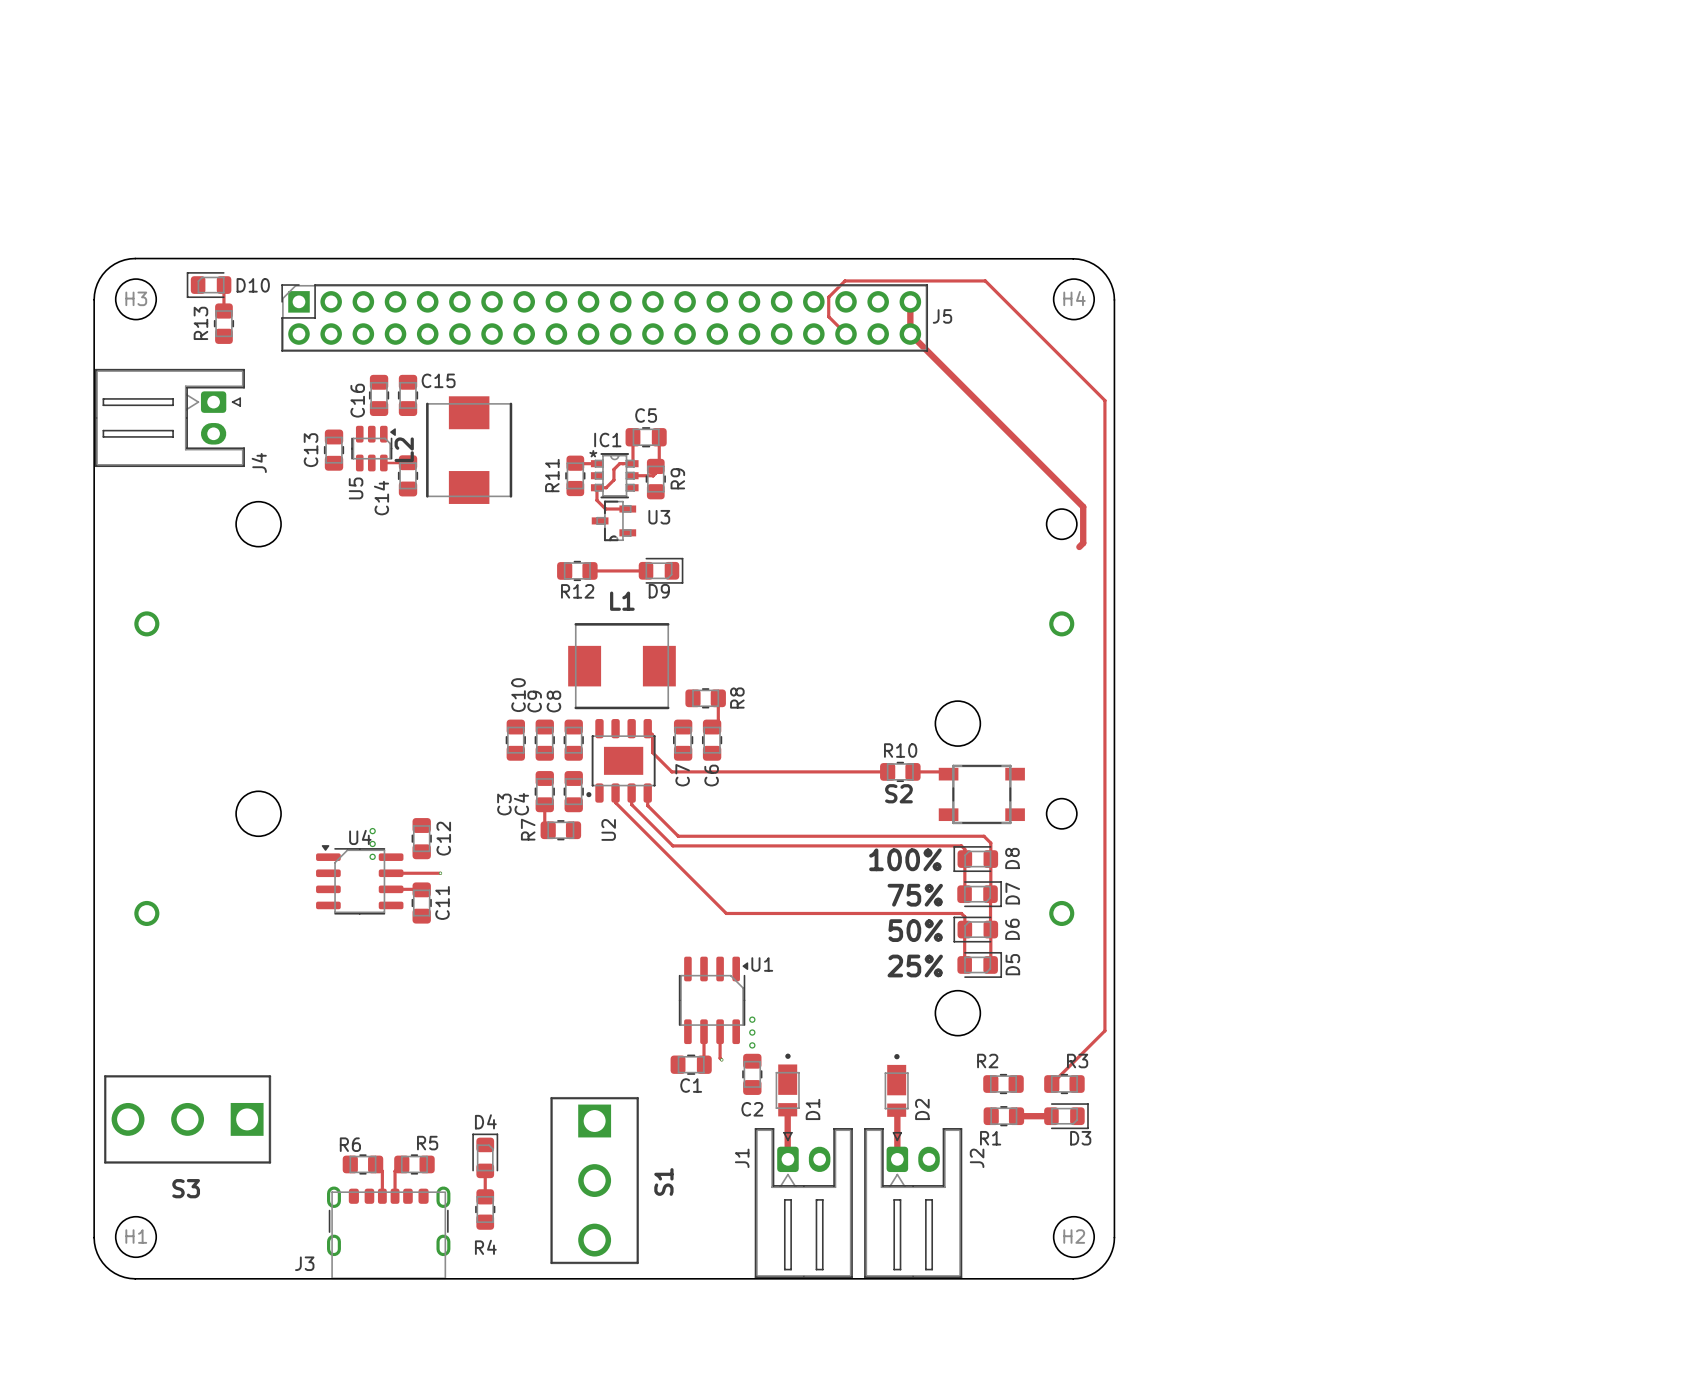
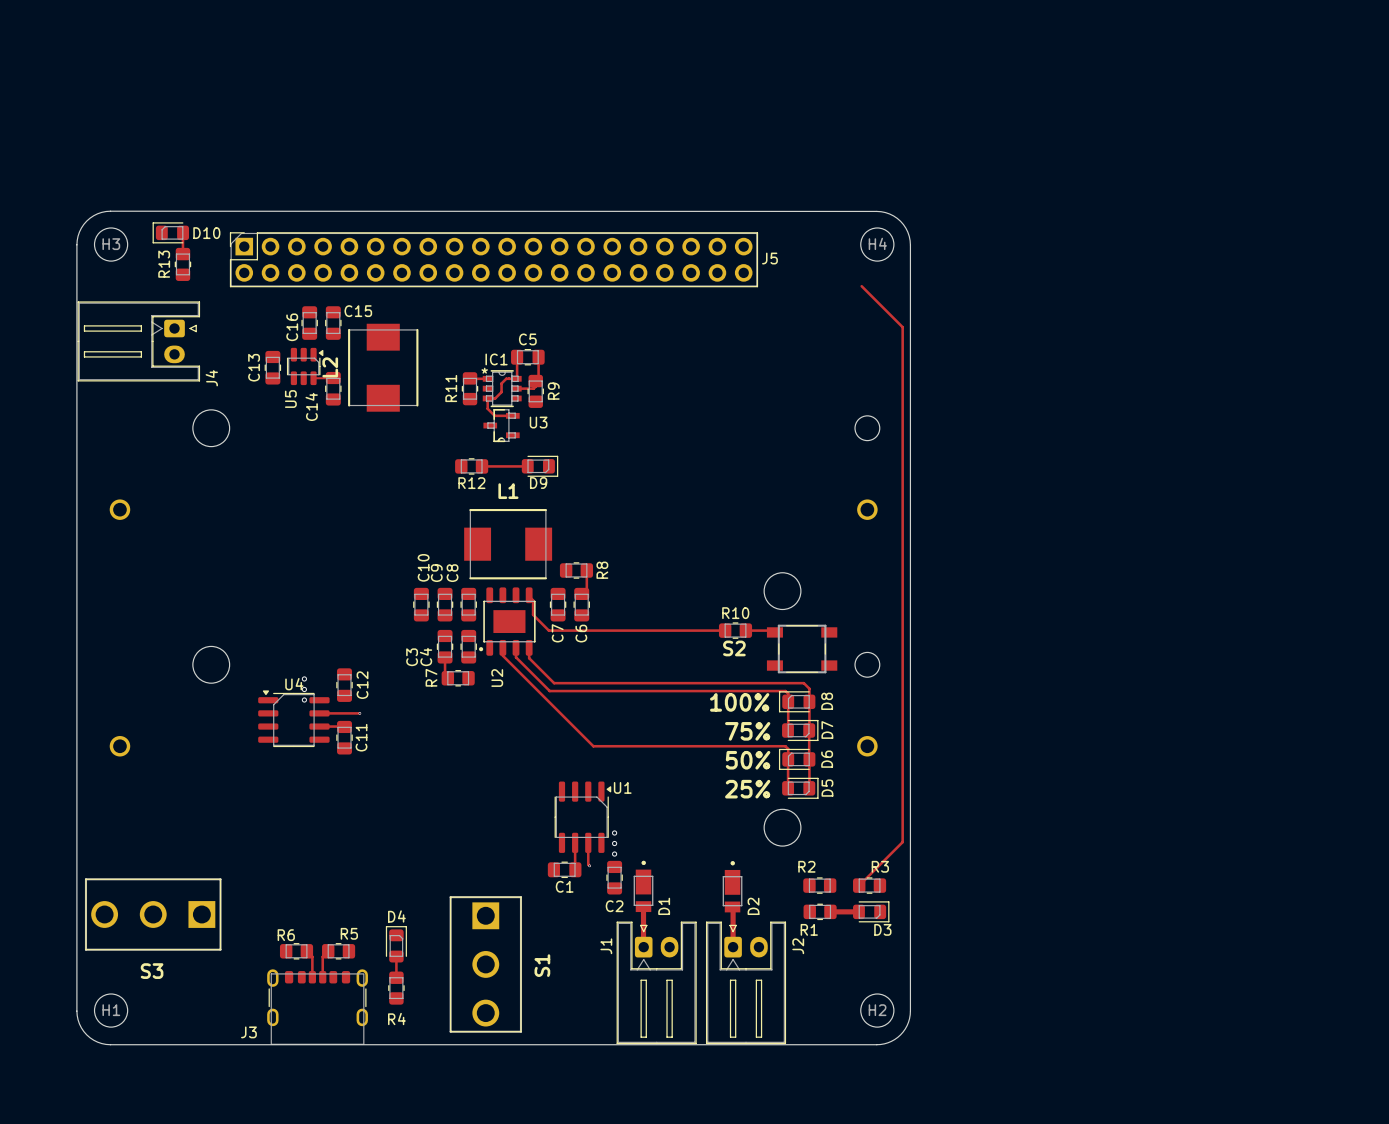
track: (910, 301) (910, 334) (1083, 506) (1083, 543) (1079, 546) -> none
track: (846, 334) (828, 316) (828, 297) (844, 280) (985, 280) (1054, 350) -> none

